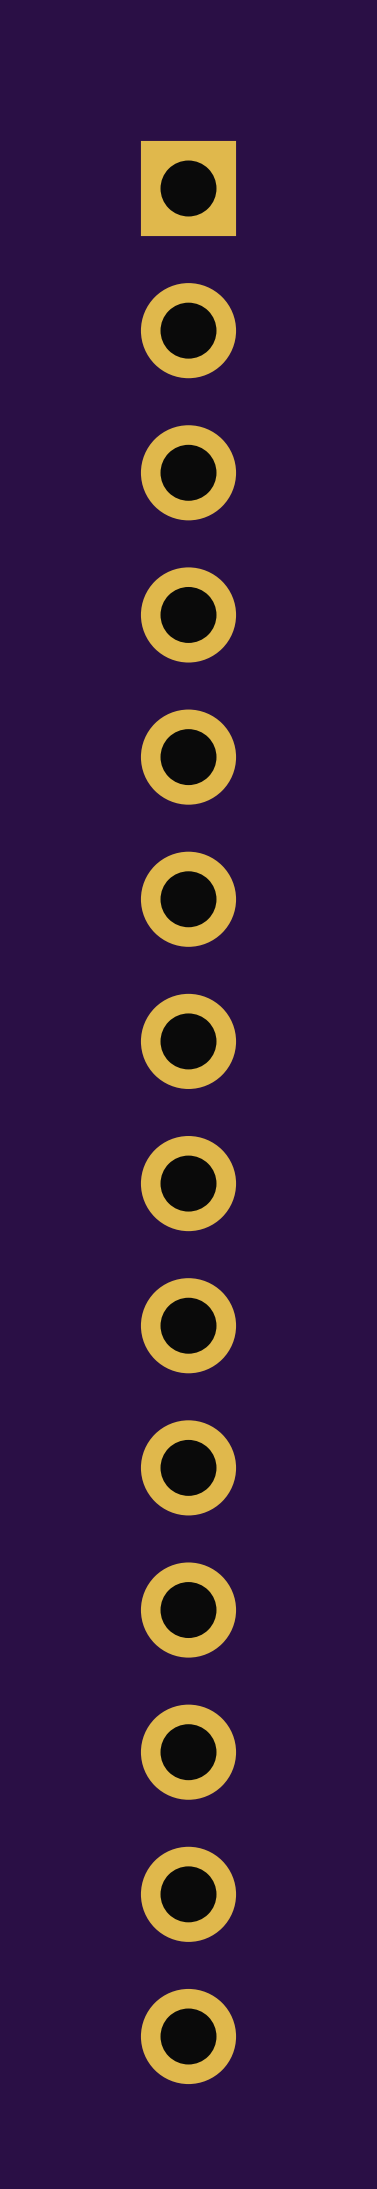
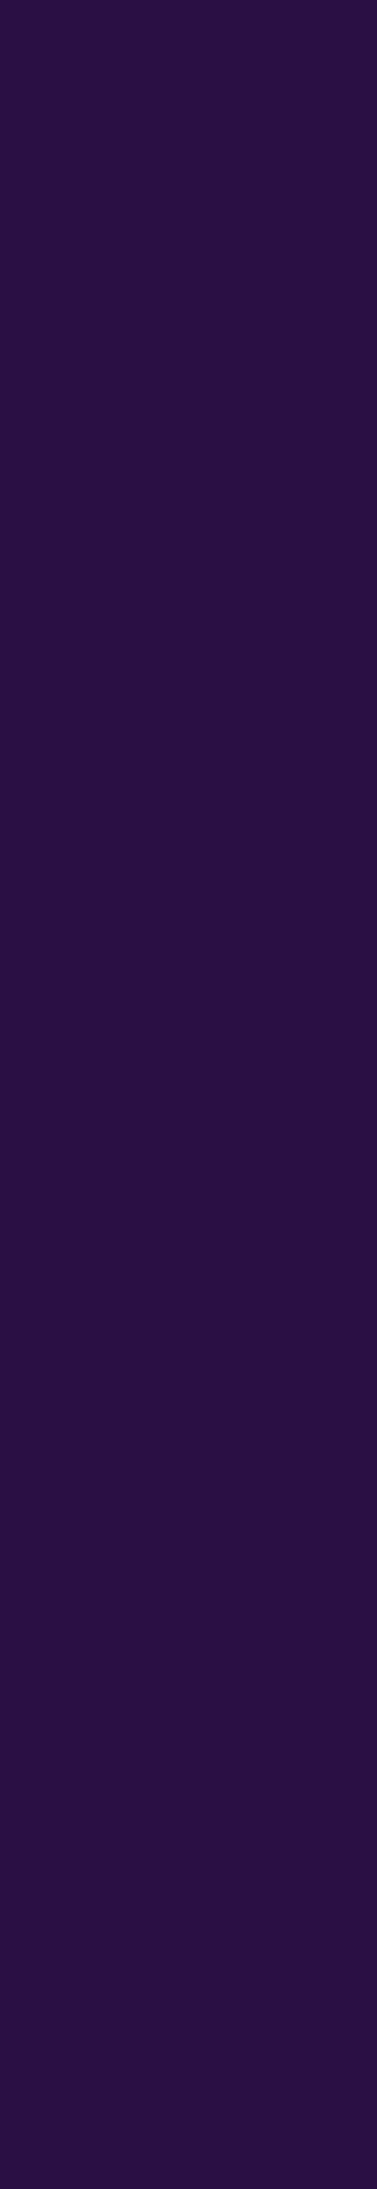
part: (188, 1112) -> none

